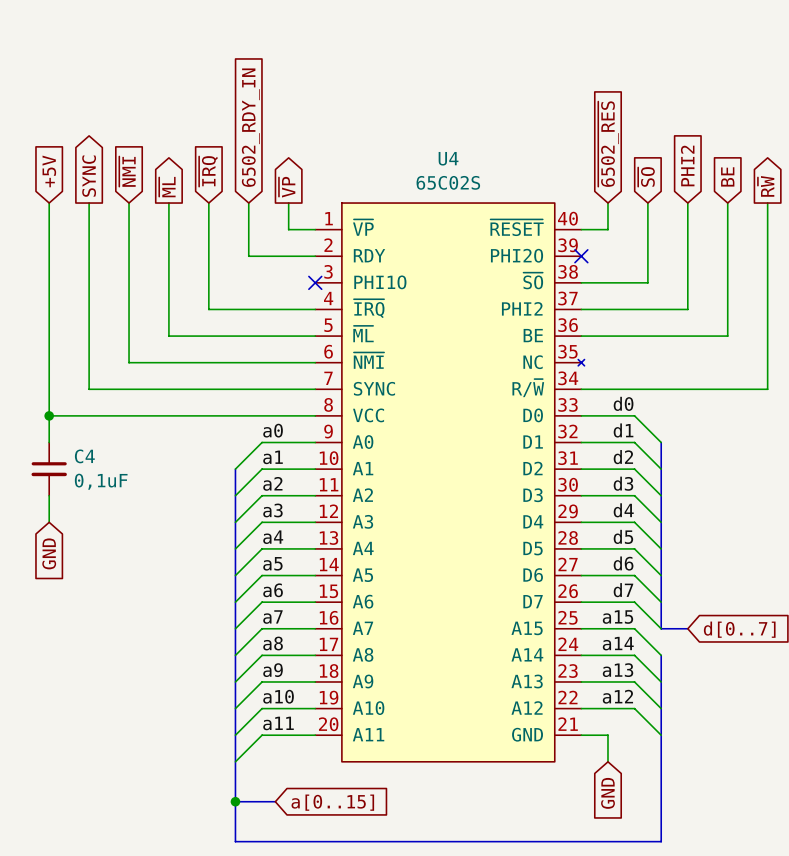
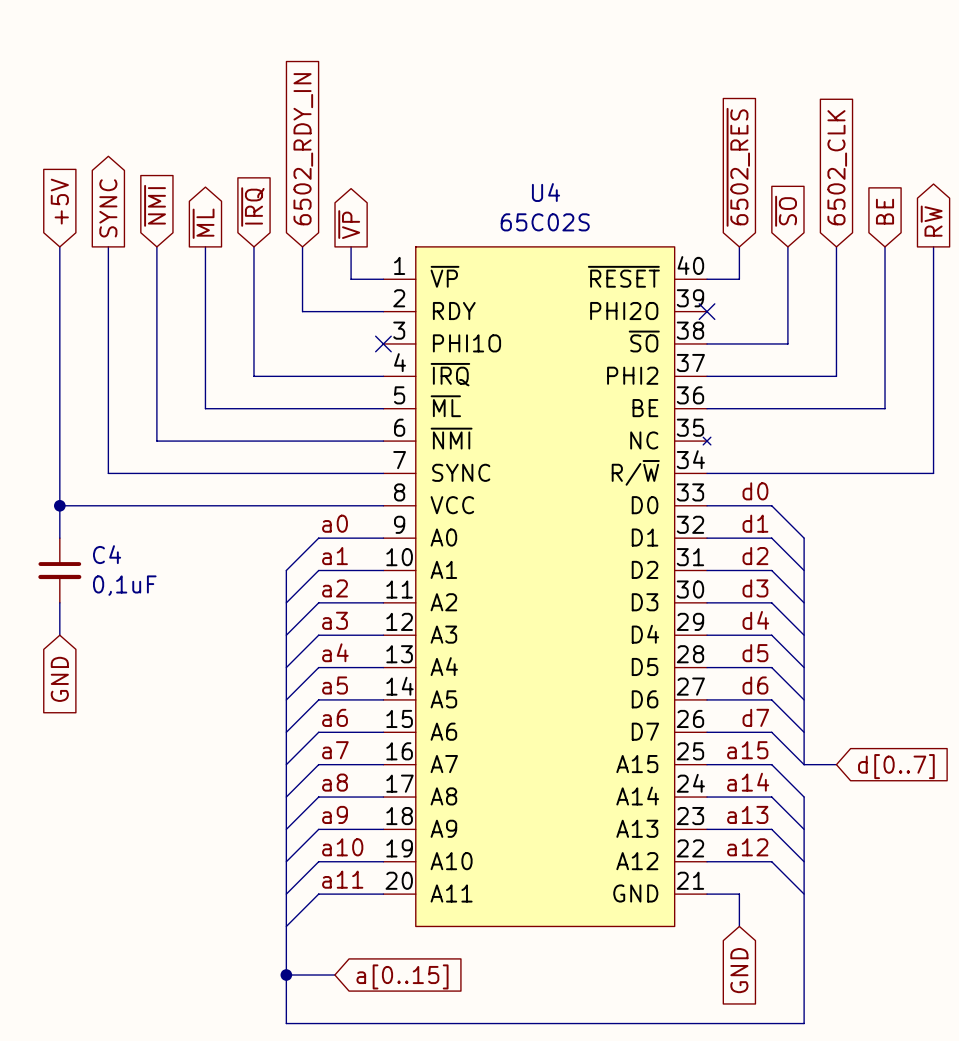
global label: PHI2 (687, 165) -> 6502_CLK (837, 167)

